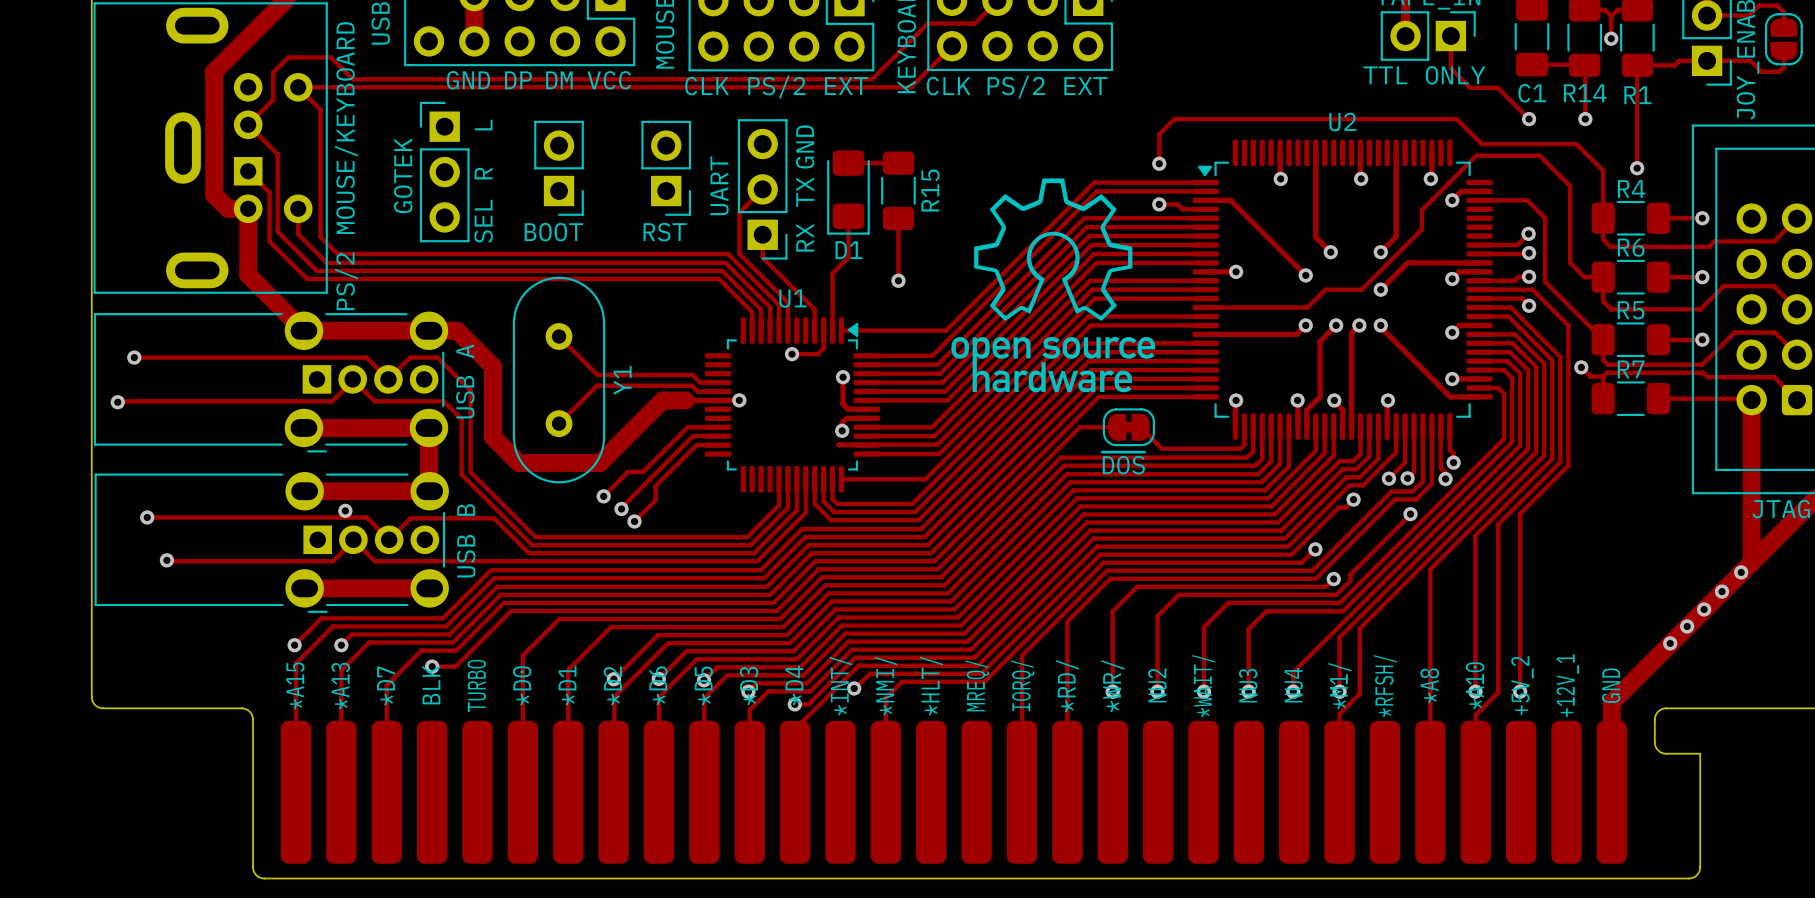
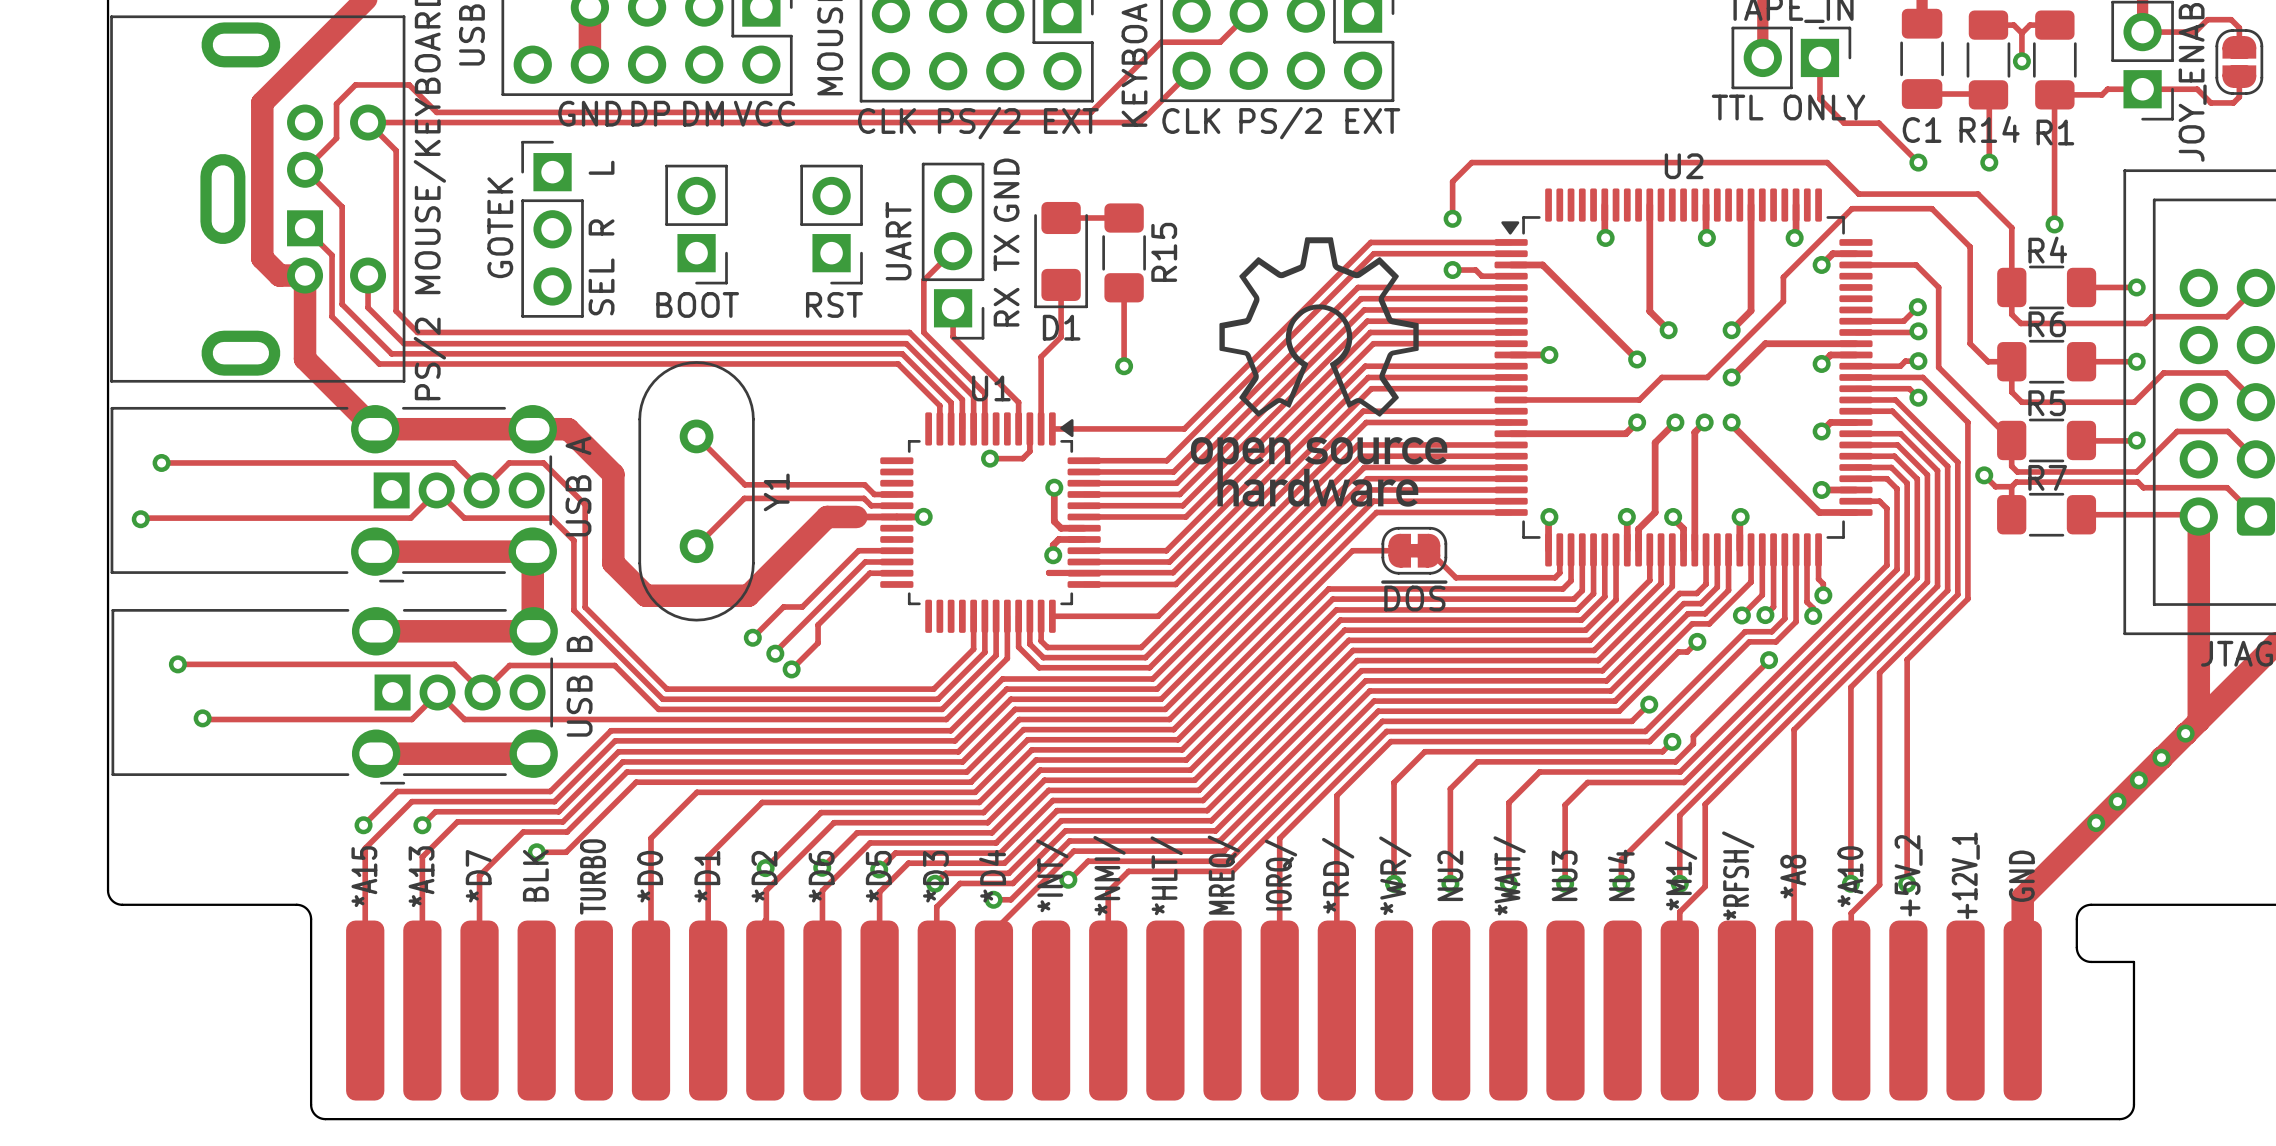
via: (345, 510) -> none

